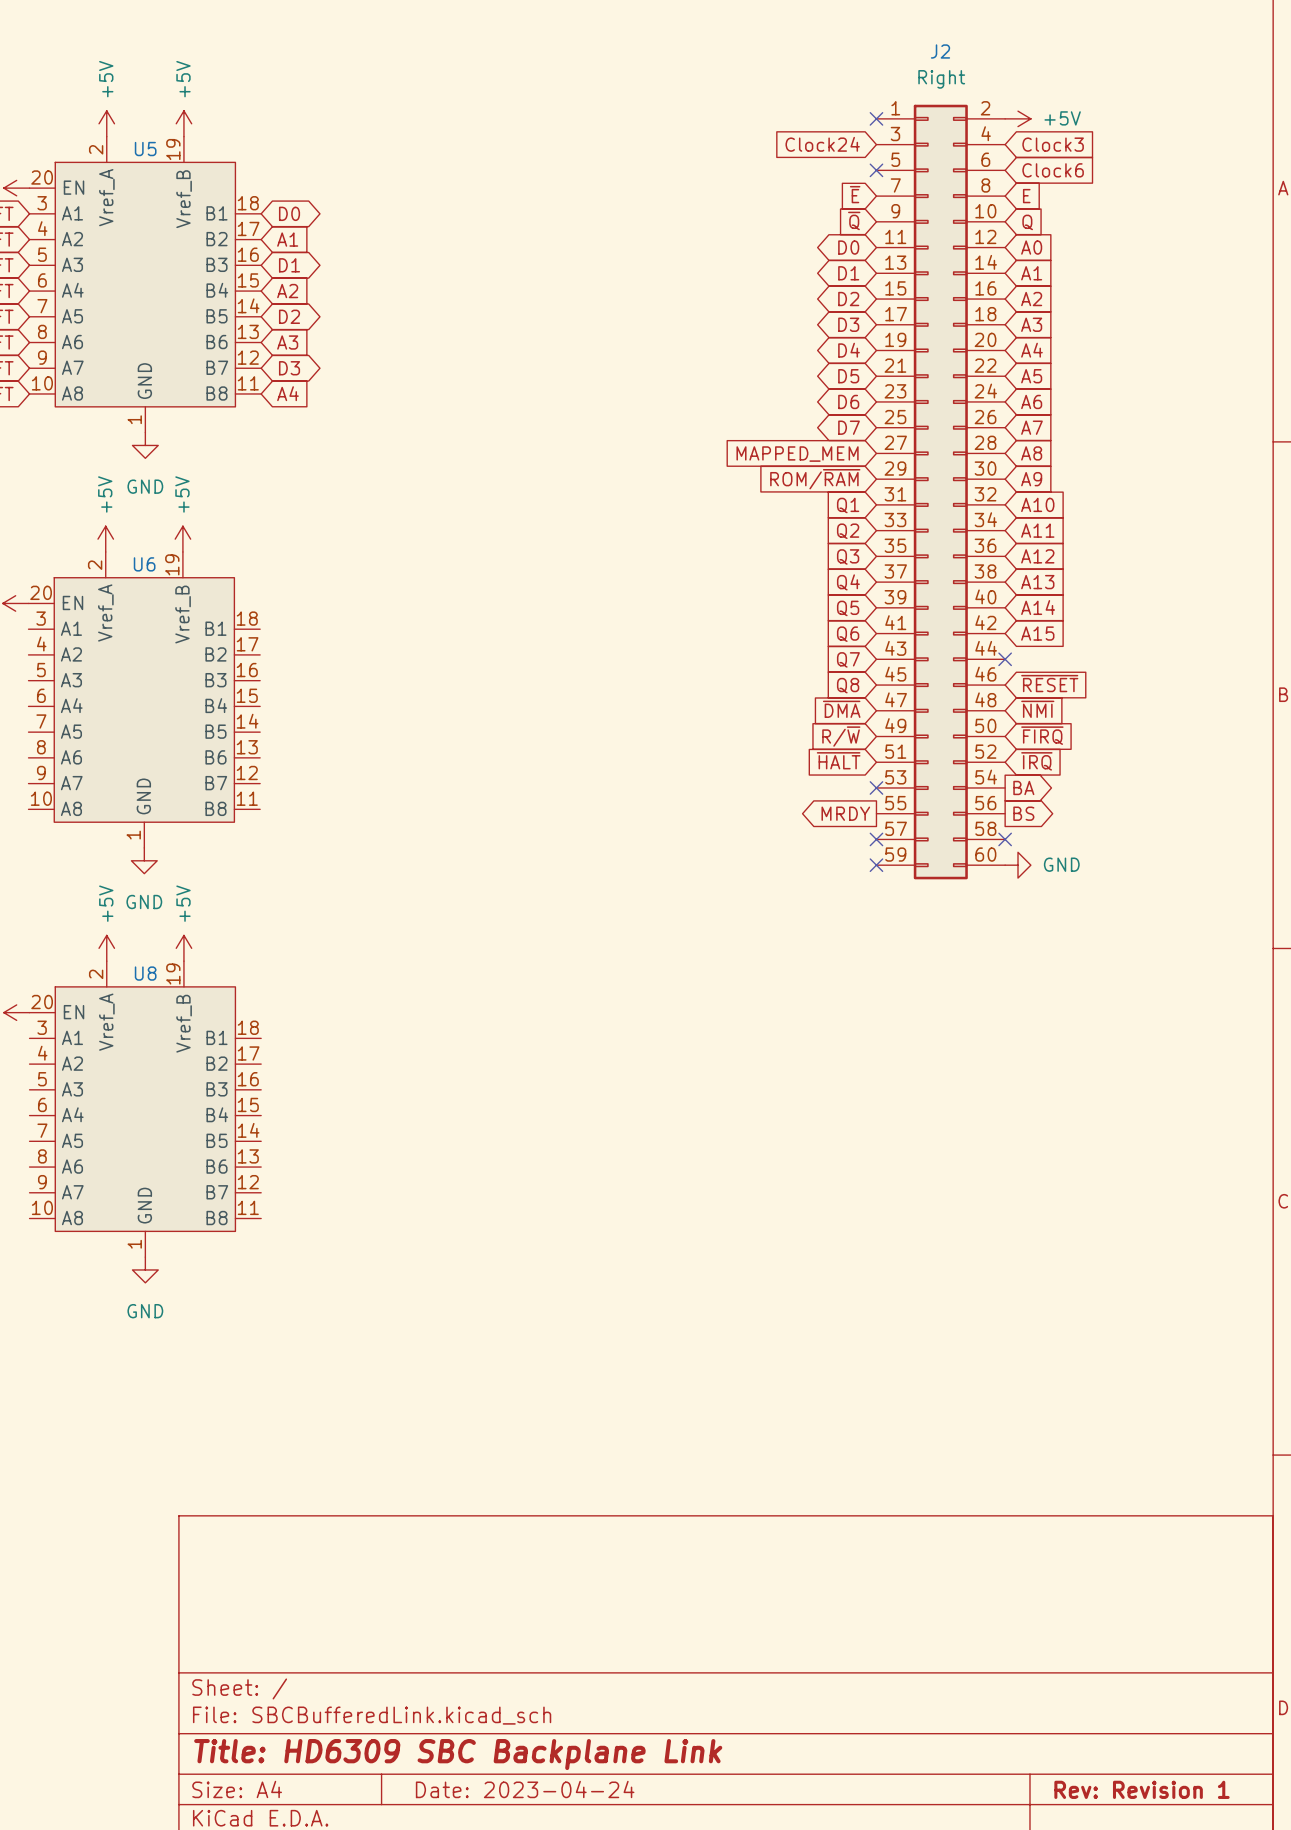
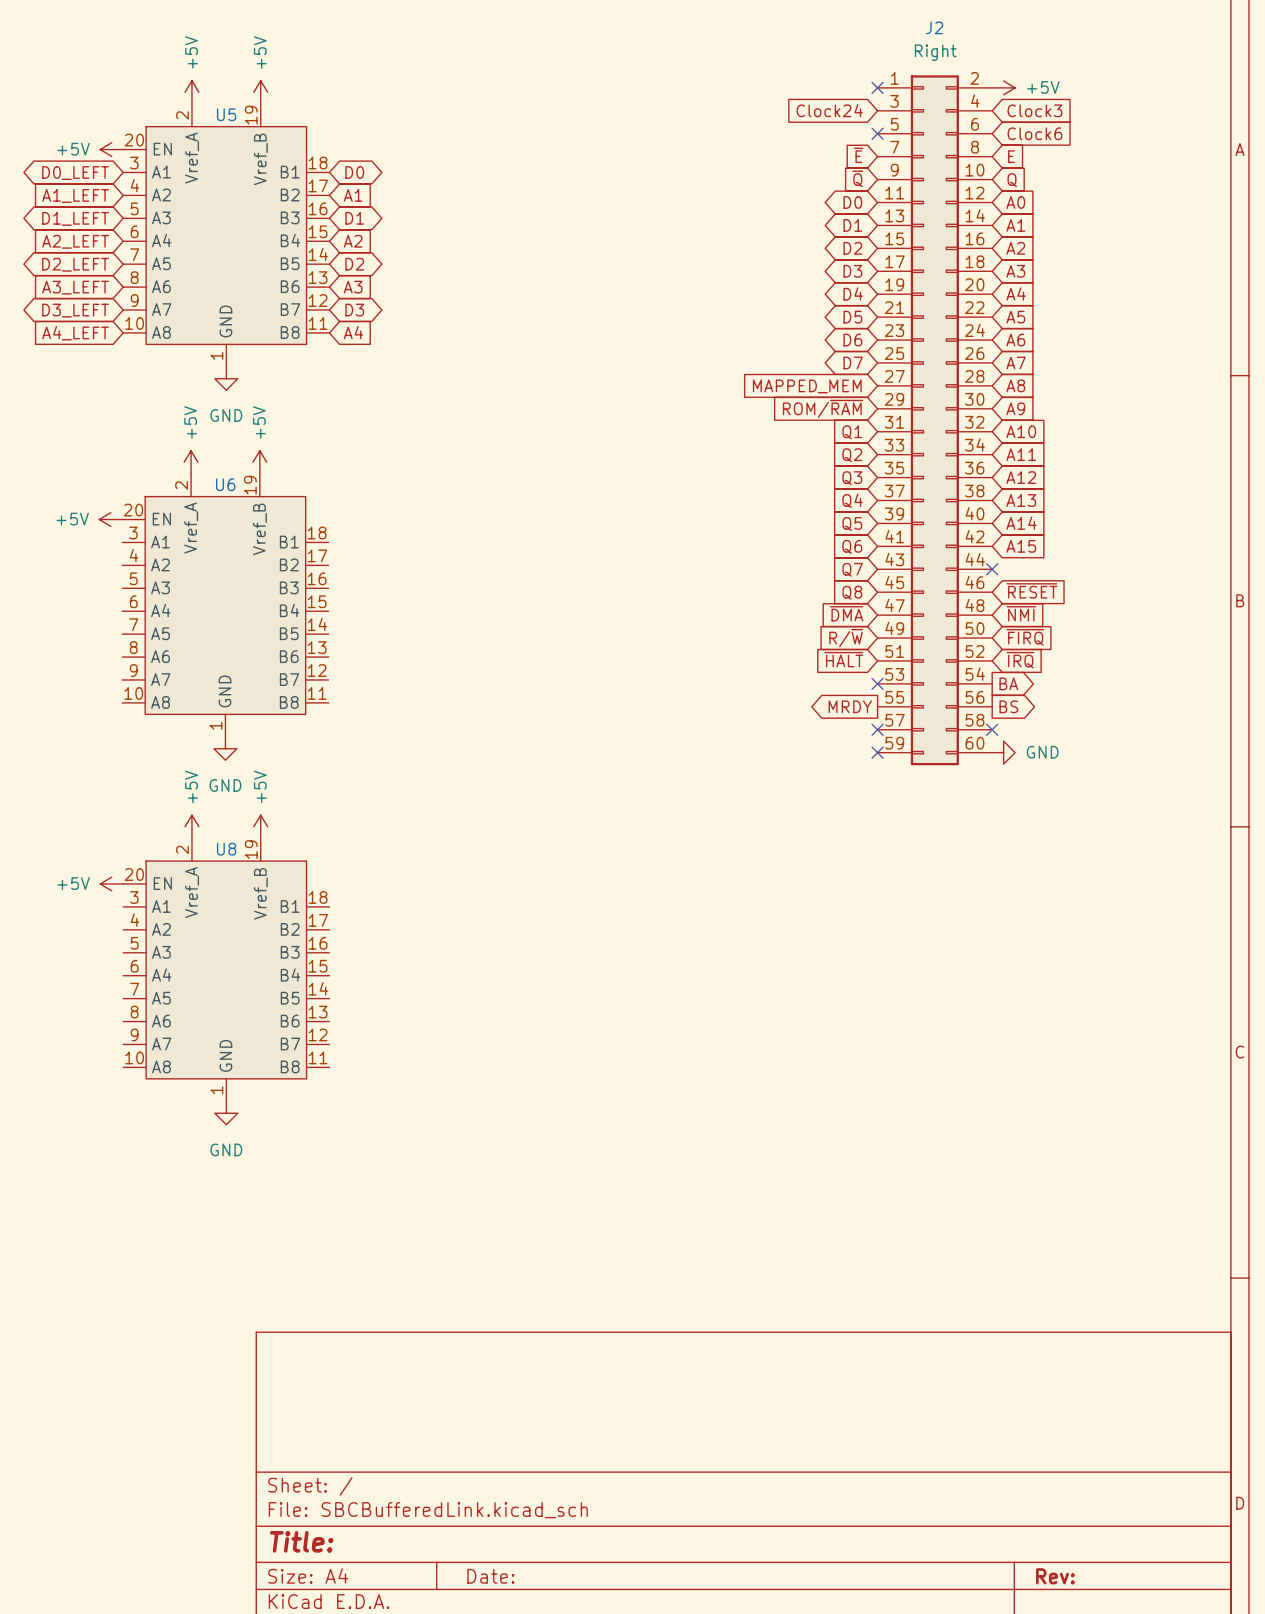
title block: Title: HD6309 SBC Backplane Link (458, 1754) -> Title: (301, 1541)
title block: Date: 2023-04-24 (525, 1789) -> Date: (490, 1576)
title block: Rev: Revision 1 (1141, 1789) -> Rev: (1055, 1576)

